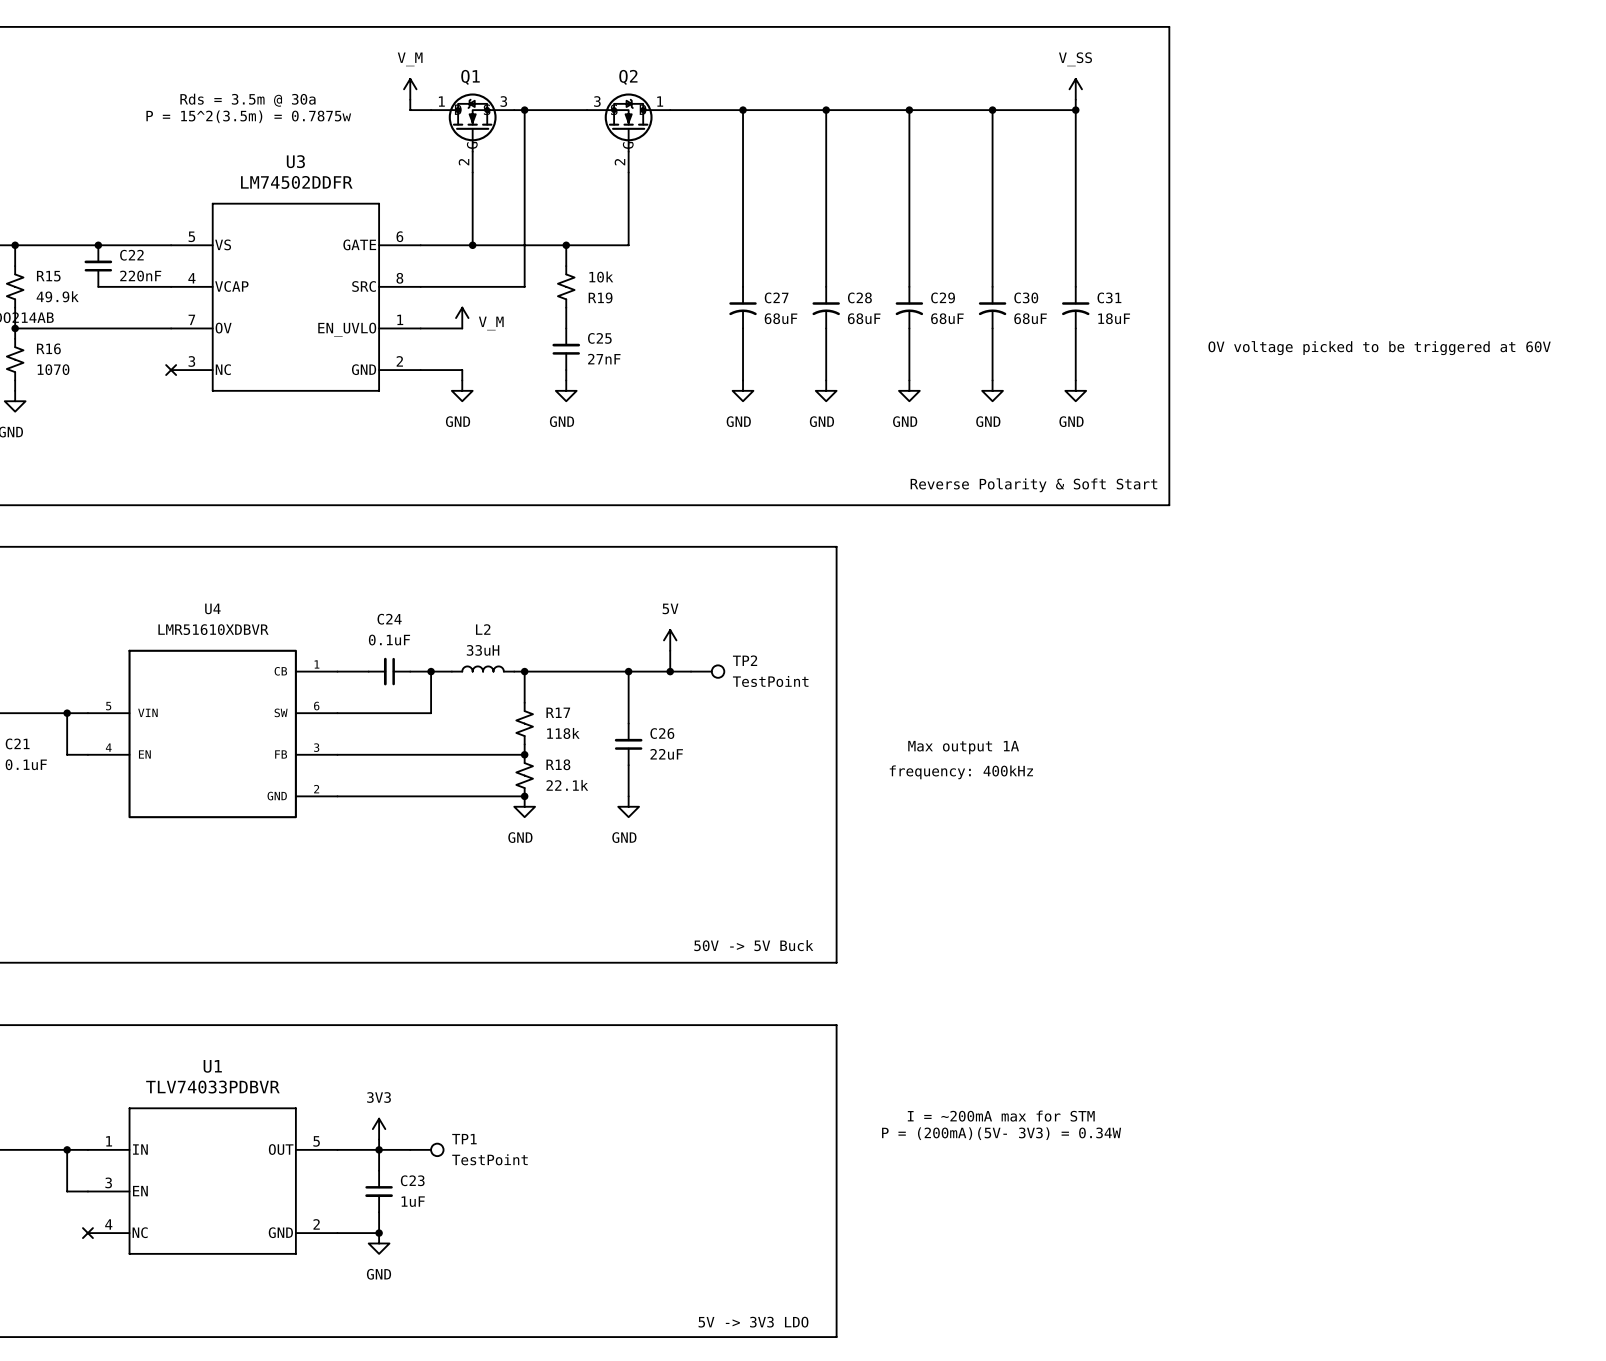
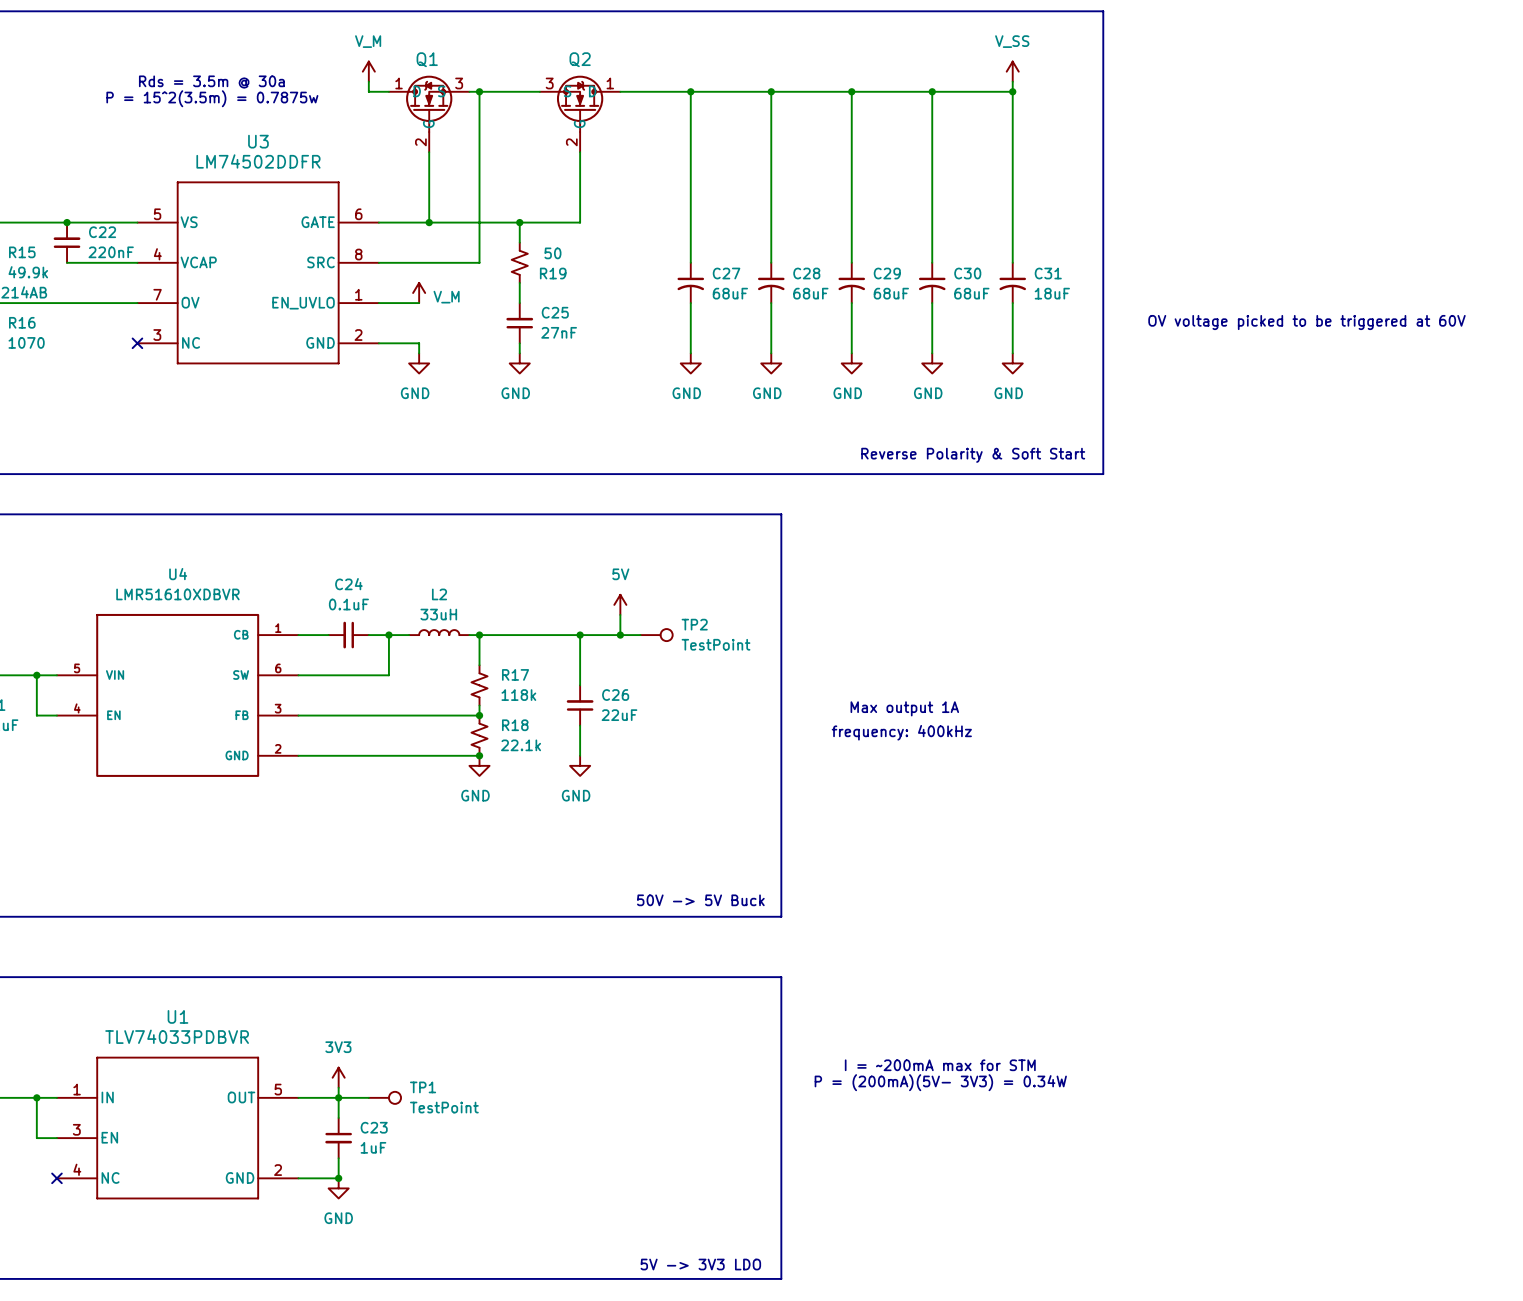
R19 value: 10k (601, 277) -> 50 (552, 253)

